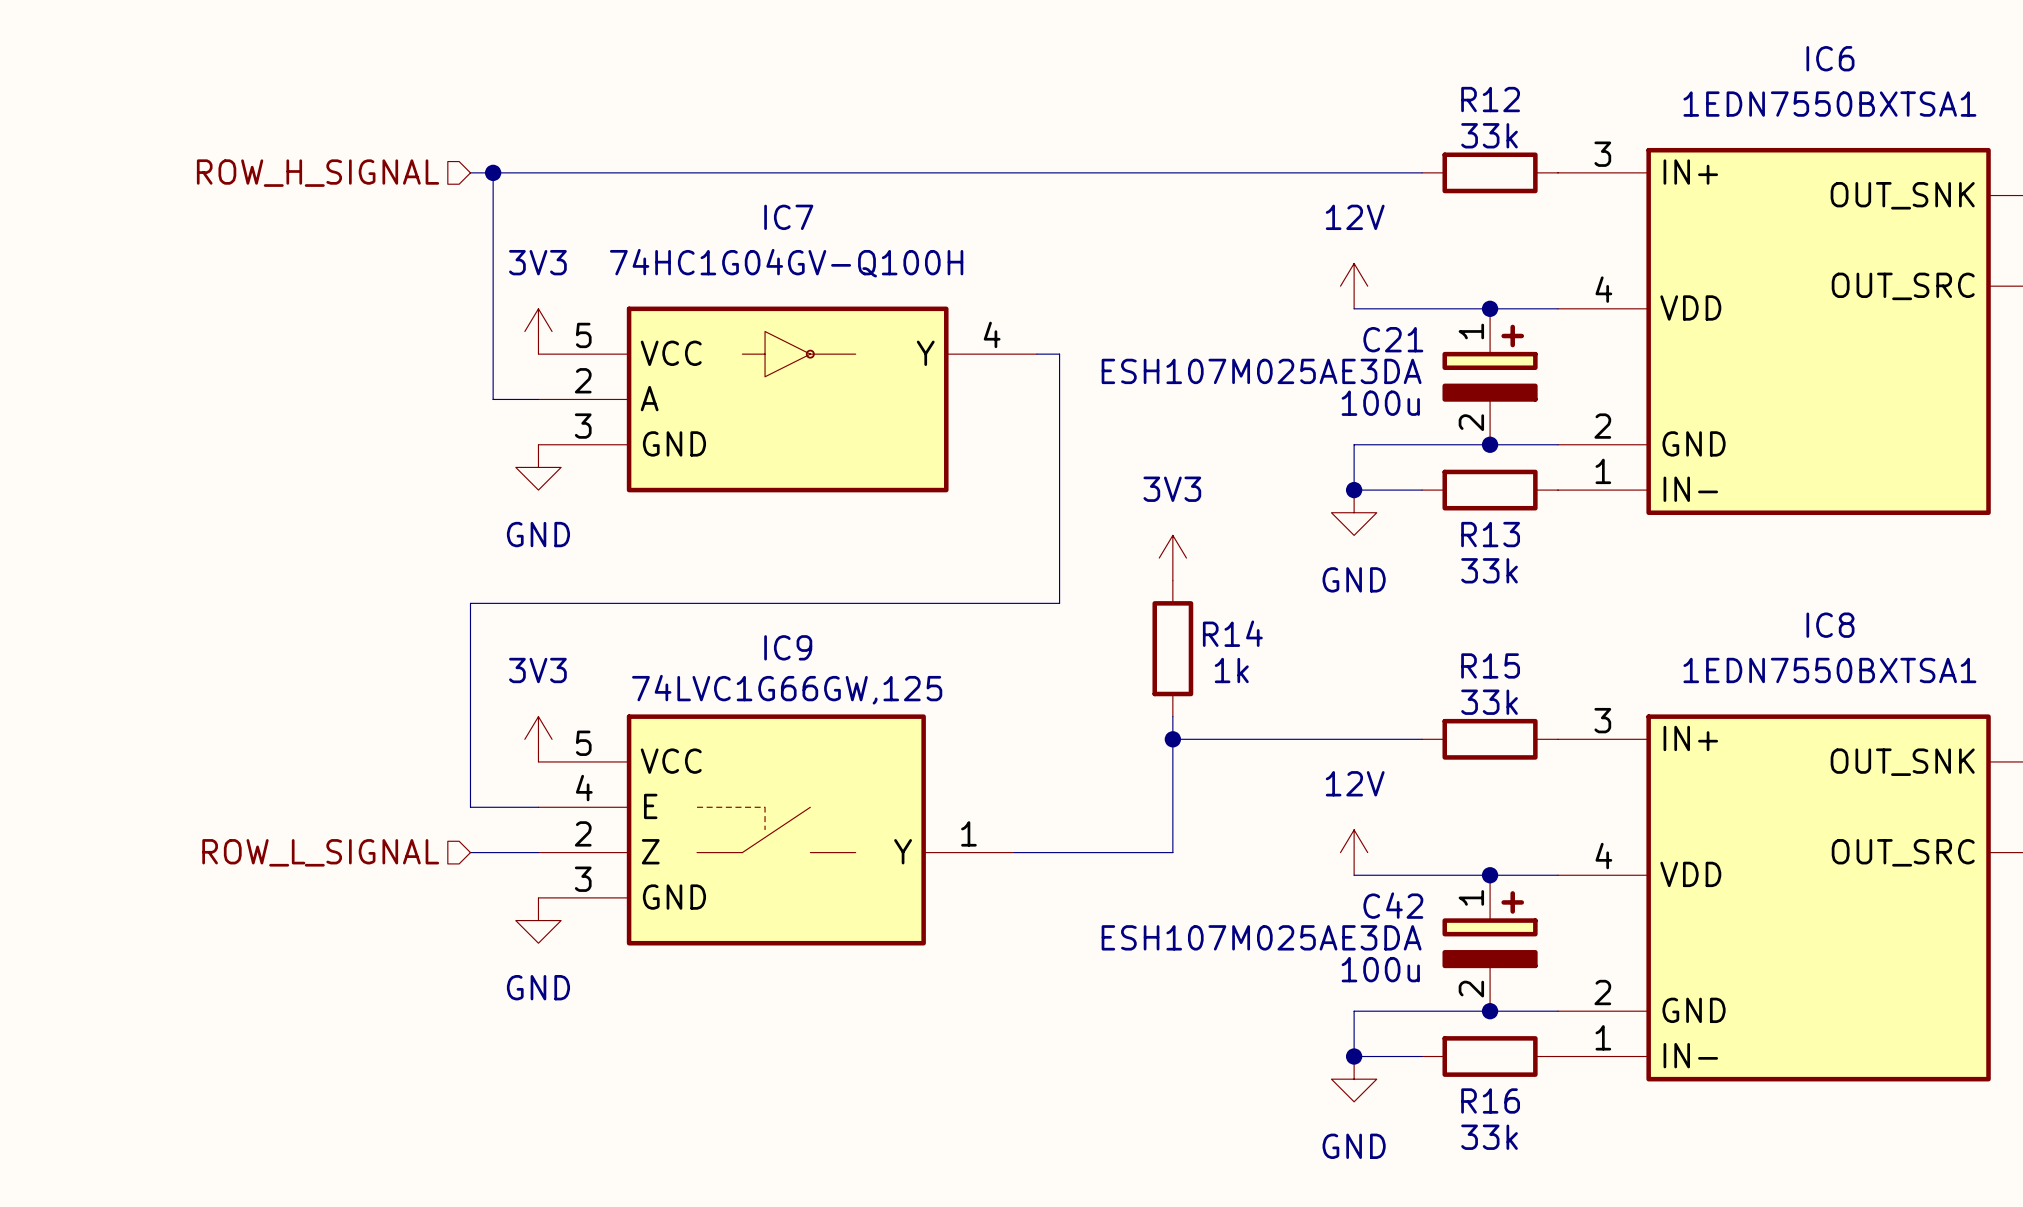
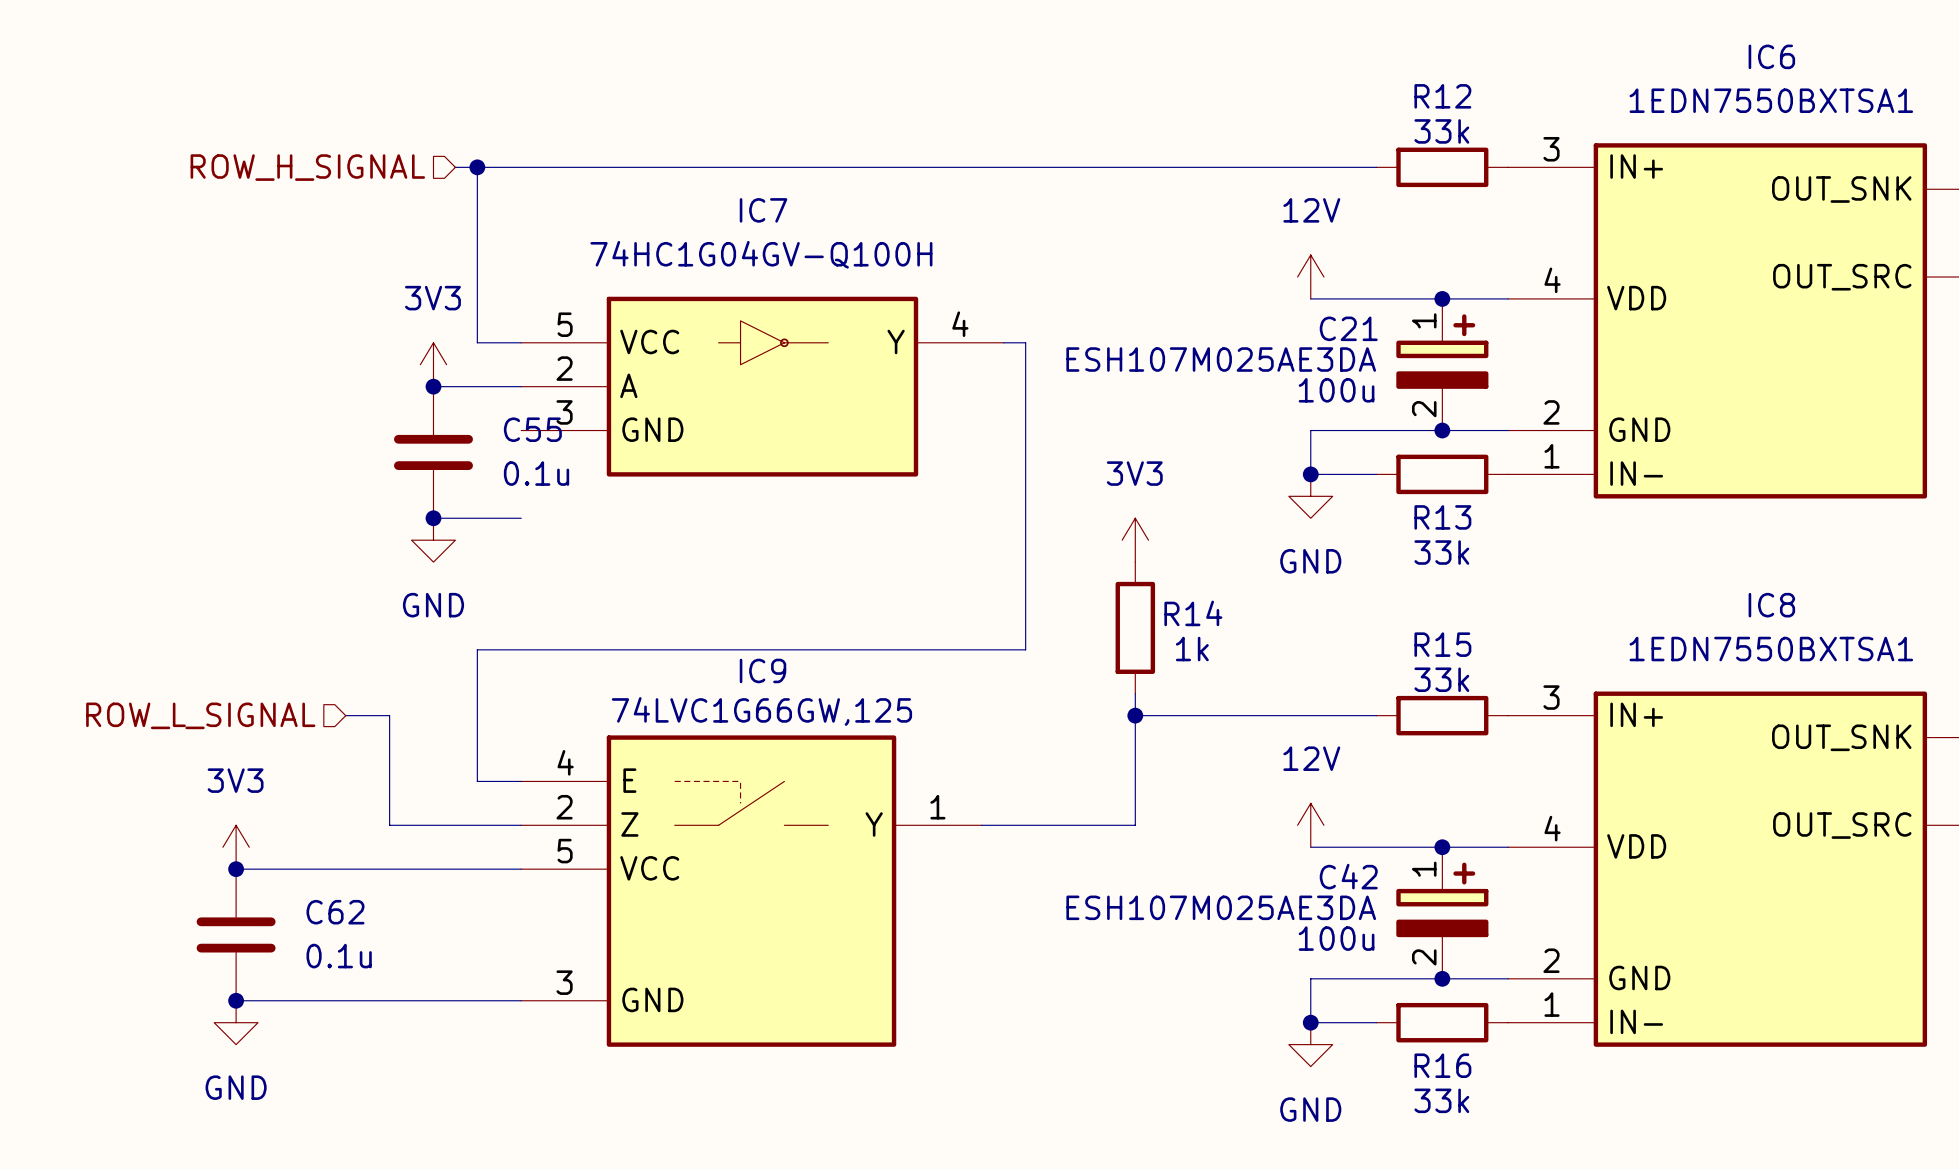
power symbol position: 3V3 (538, 331) -> 3V3 (433, 364)
wire: (493, 354) (493, 399) -> (433, 386) (477, 386)
wire: none -> (477, 342) (521, 342)
junction: none -> (433, 386)
C55: none -> 0.1u (433, 452)
power symbol position: GND (538, 467) -> GND (433, 540)
wire: none -> (433, 518) (521, 518)
junction: none -> (433, 518)
wire: (1059, 603) (470, 603) (470, 807) (493, 807) -> (1025, 584) (1025, 649) (477, 649) (477, 781)
IC9 name position: IC9 (788, 647) -> IC9 (762, 670)
IC9 value position: 74LVC1G66GW,125 (787, 689) -> 74LVC1G66GW,125 (761, 711)
IC9 symbol: [538, 714, 1015, 946] -> [521, 735, 982, 1047]
wire: none -> (345, 715) (389, 715) (389, 825) (455, 825)
power symbol: 3V3 (538, 739) -> none
hierarchical label position: ROW_L_SIGNAL (320, 852) -> ROW_L_SIGNAL (200, 715)
power symbol: none -> 3V3 (236, 847)
wire: none -> (236, 869) (521, 869)
junction: none -> (236, 869)
power symbol: GND (538, 920) -> none
C62: none -> 0.1u (236, 934)
wire: none -> (236, 1000) (521, 1000)
junction: none -> (236, 1000)
power symbol: none -> GND (236, 1022)

